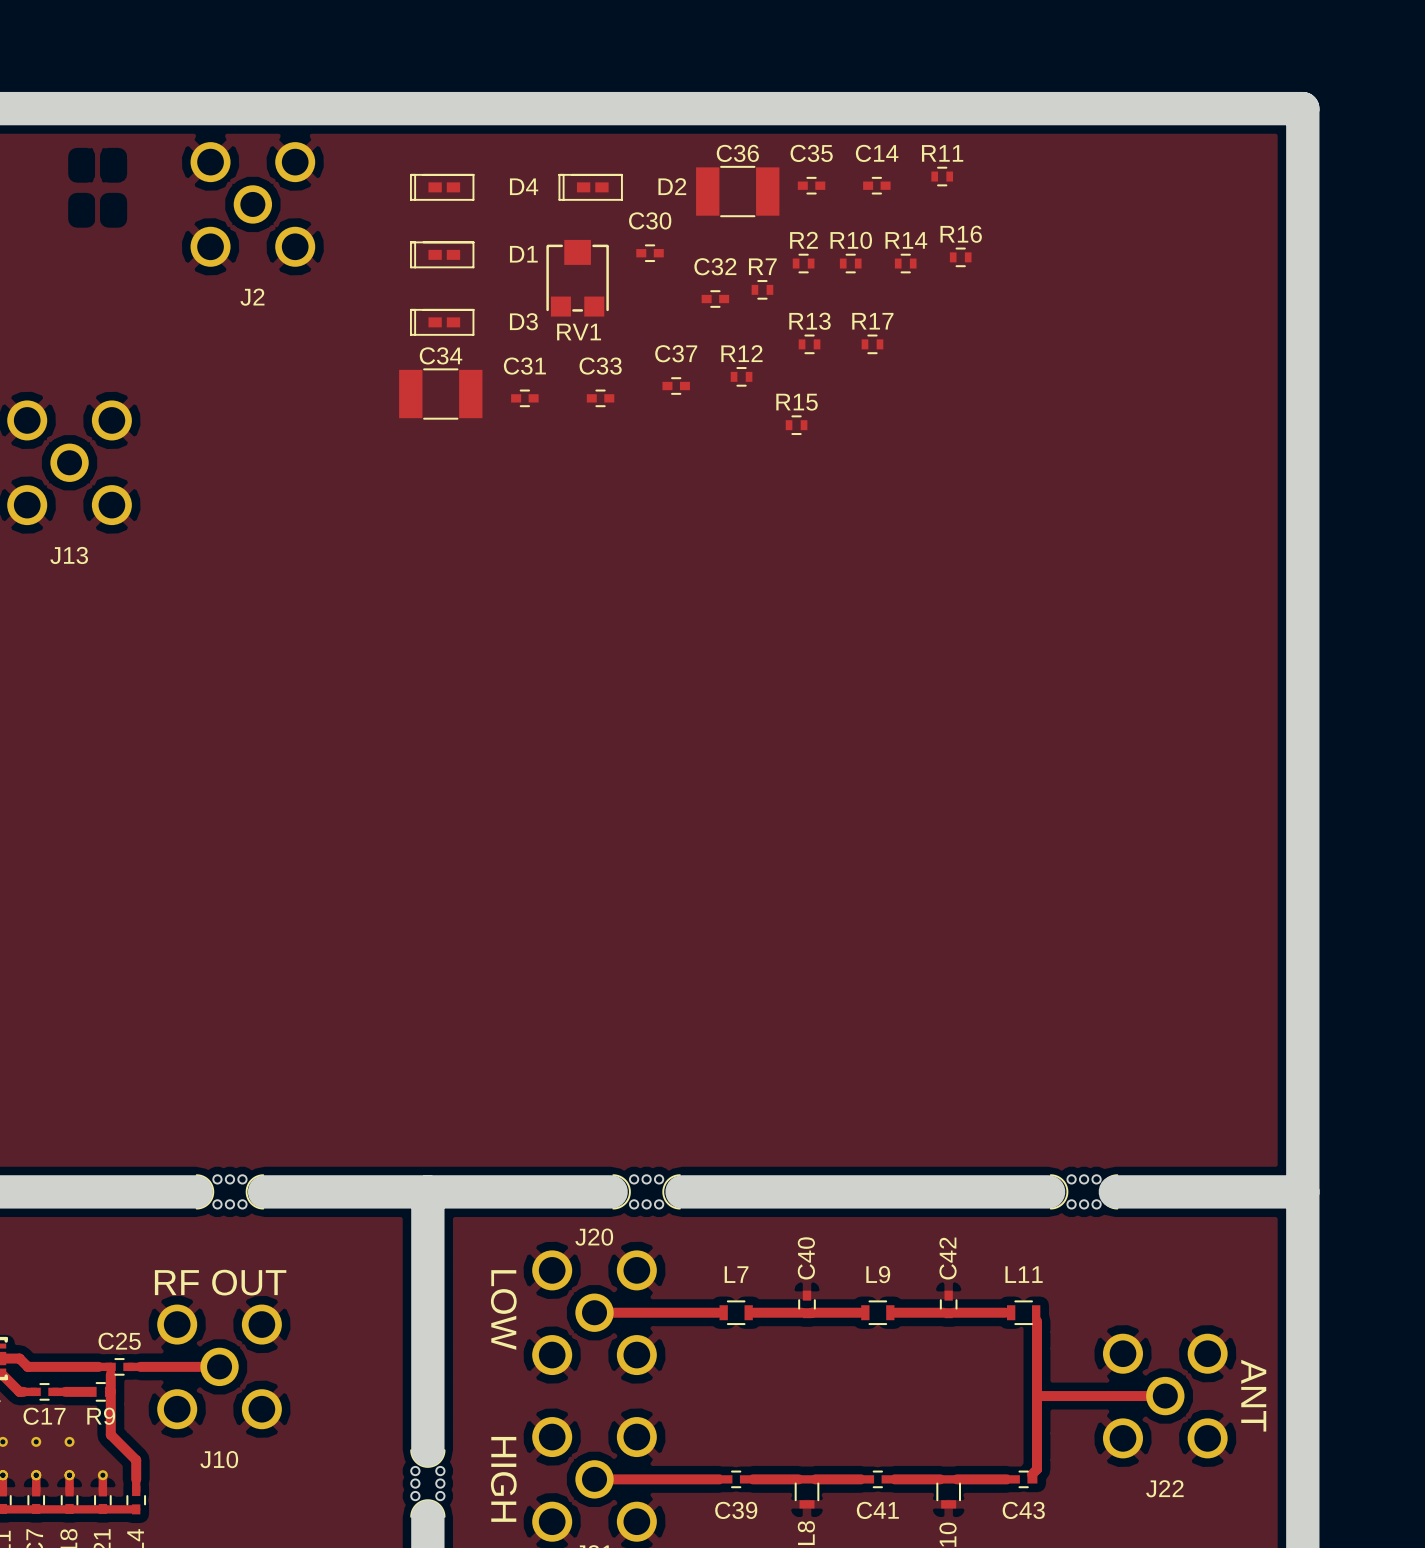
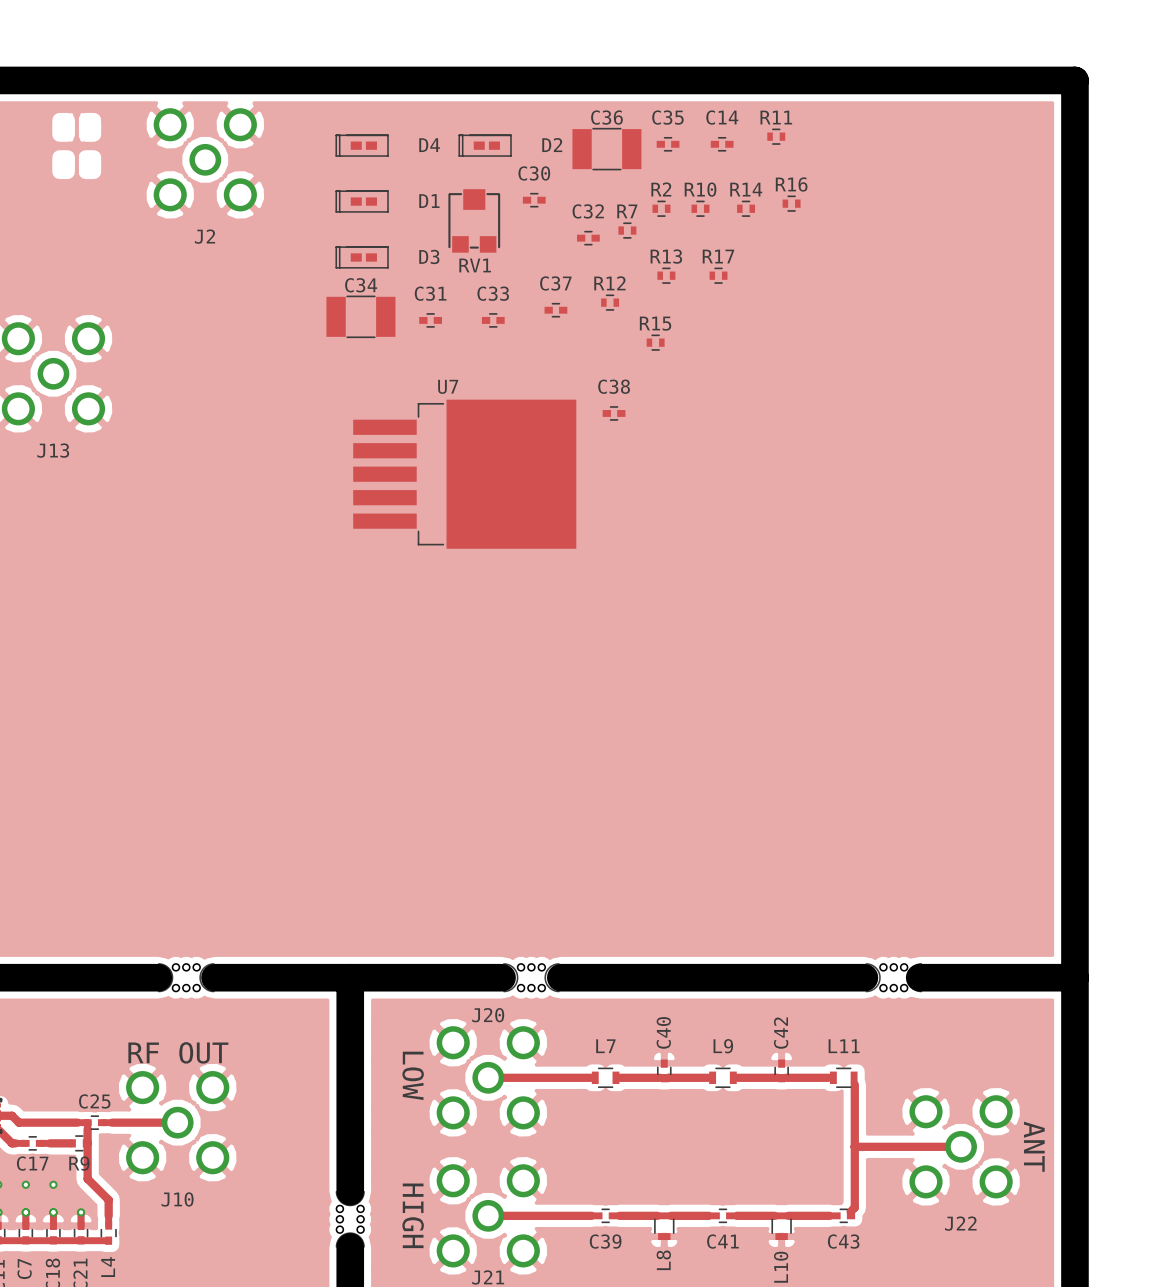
C38: none -> (614, 413)
U7: none -> (464, 474)

